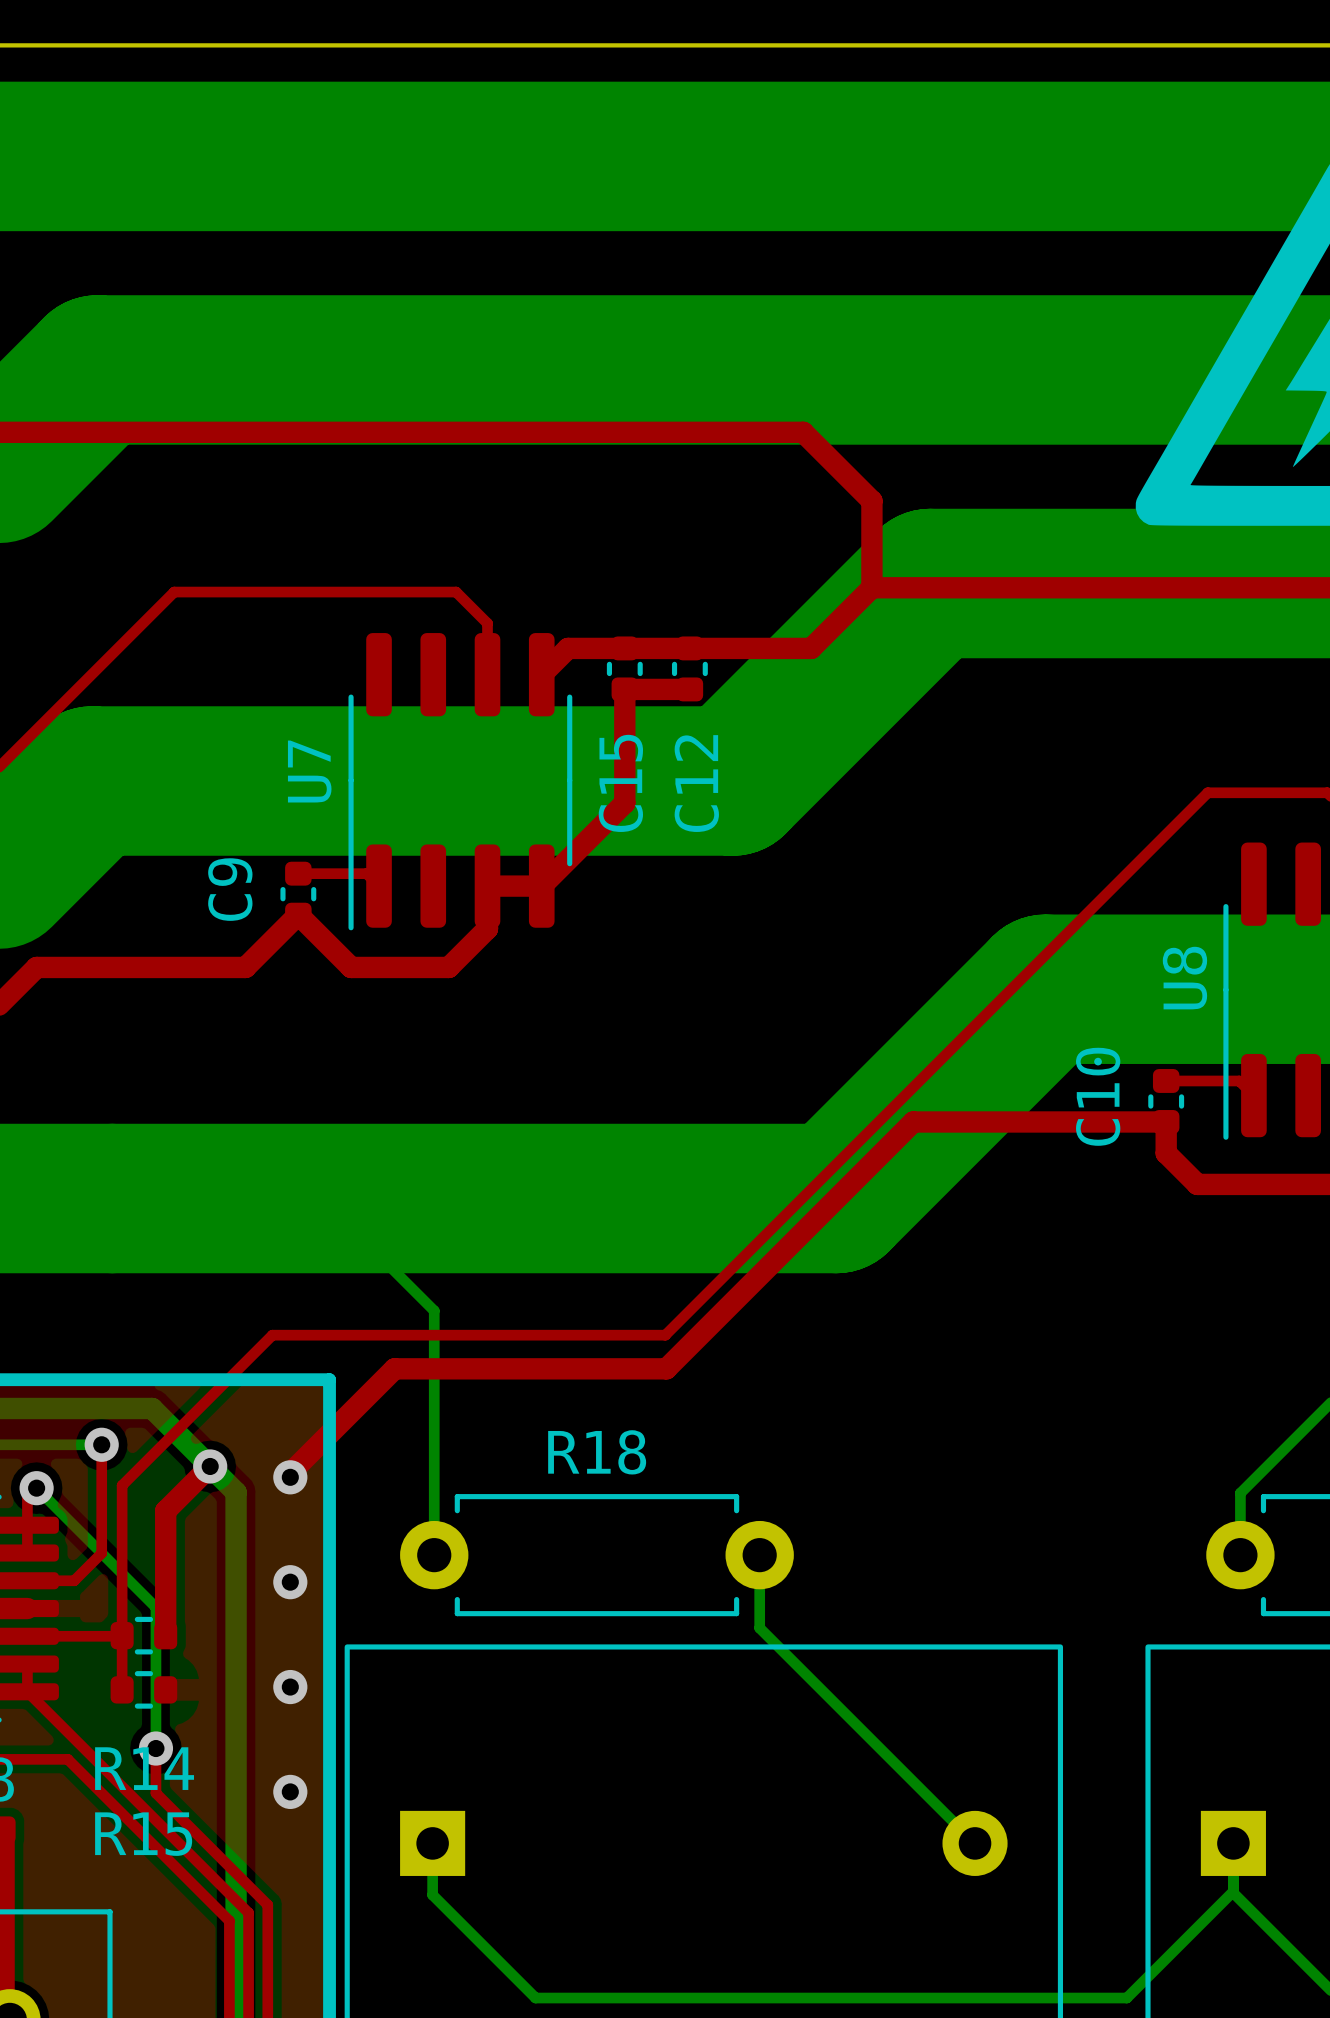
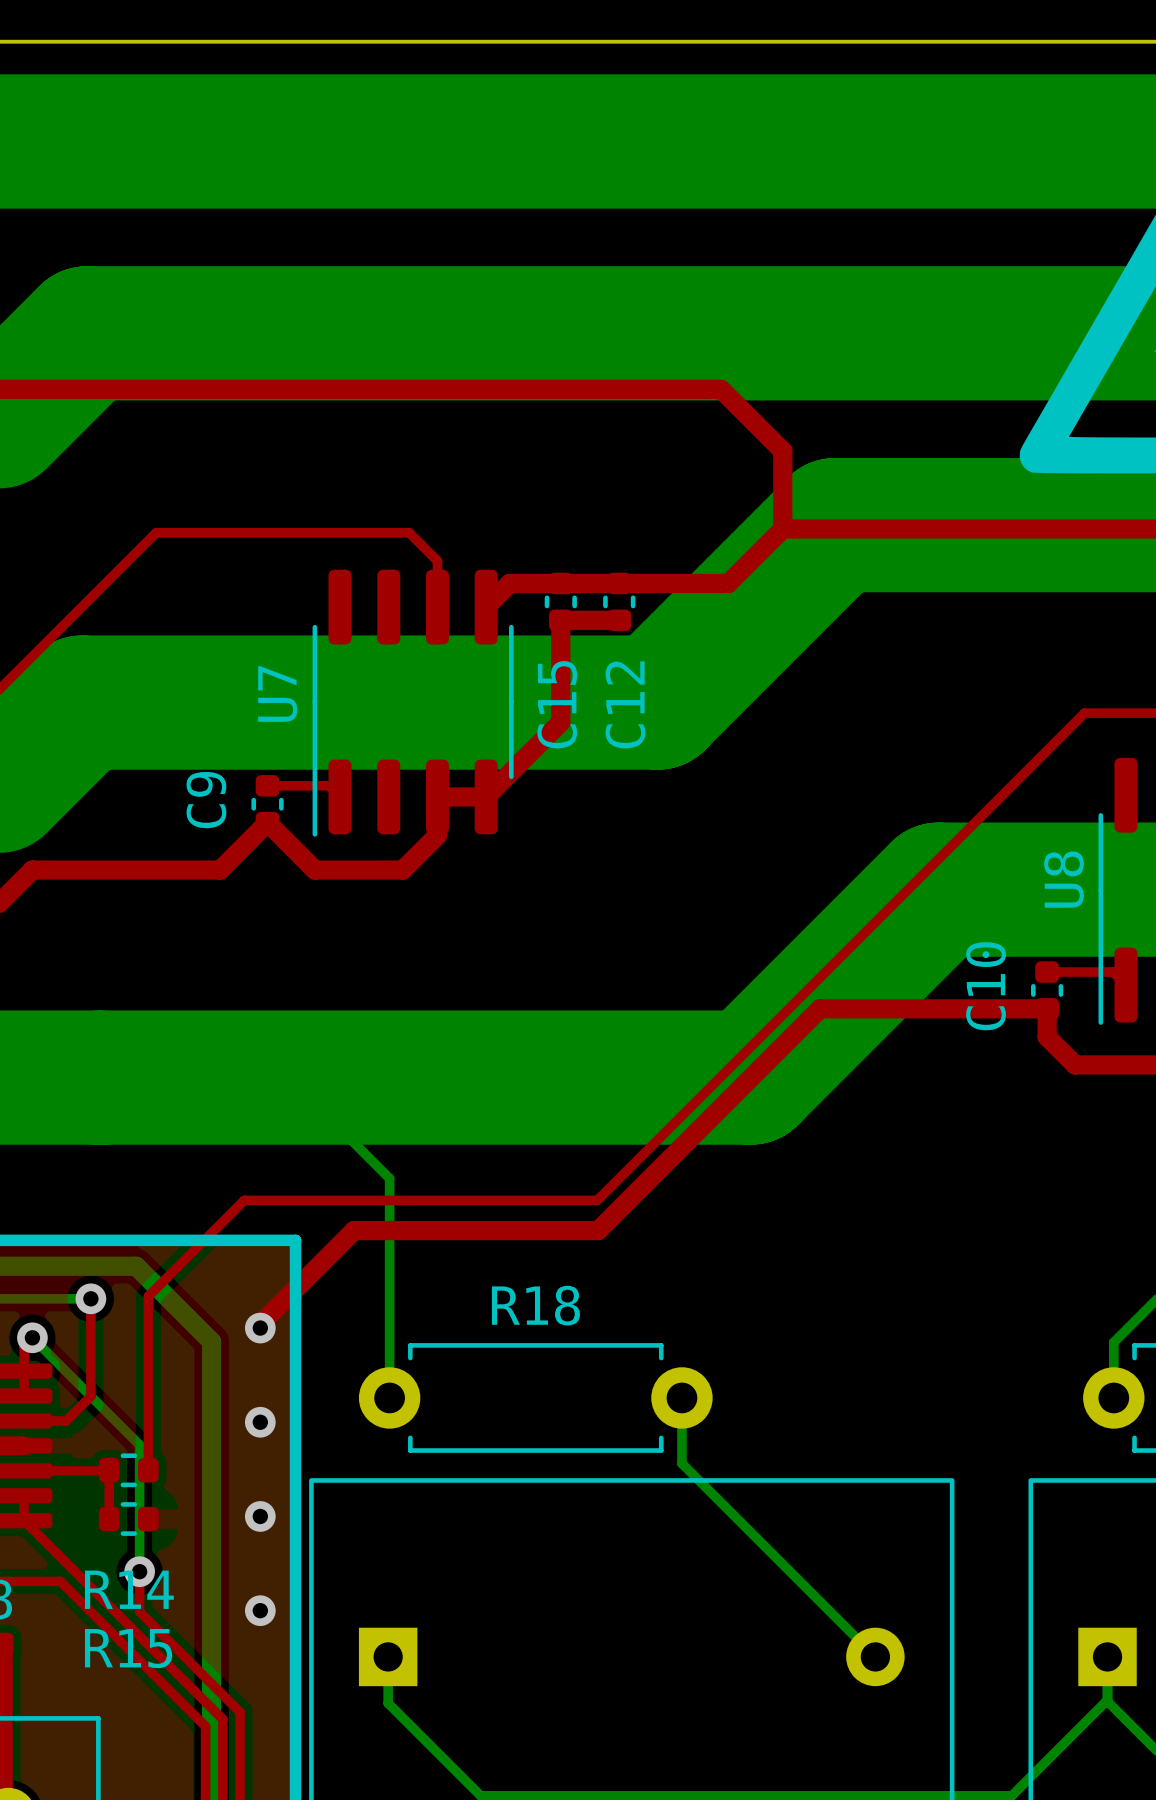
top track: (165, 1441) (122, 1485) (122, 1635) -> none
top track: (210, 1466) (165, 1510) -> (148, 1296) (148, 1358)
via: (210, 1466) -> none
top track width: thick (165, 1510) (165, 1635) -> thin (148, 1358) (148, 1470)

